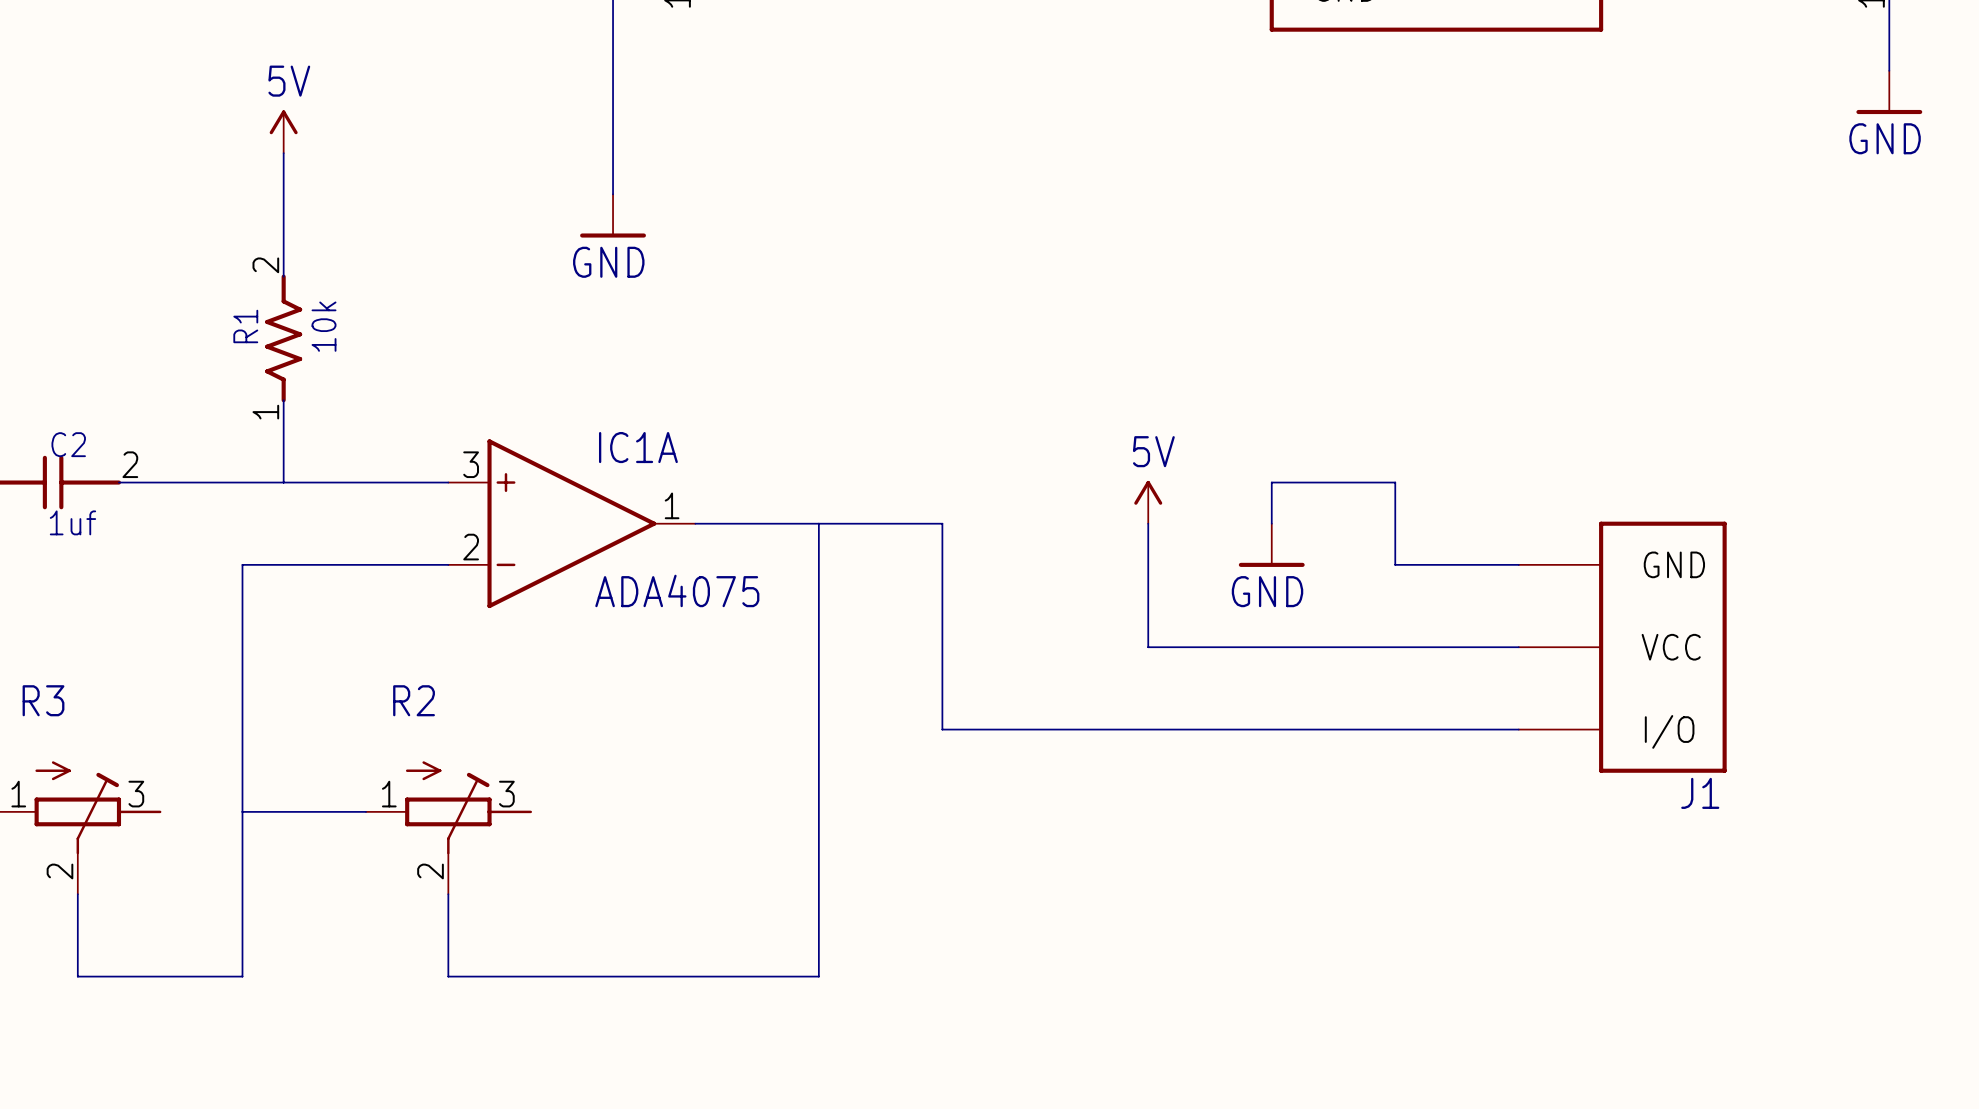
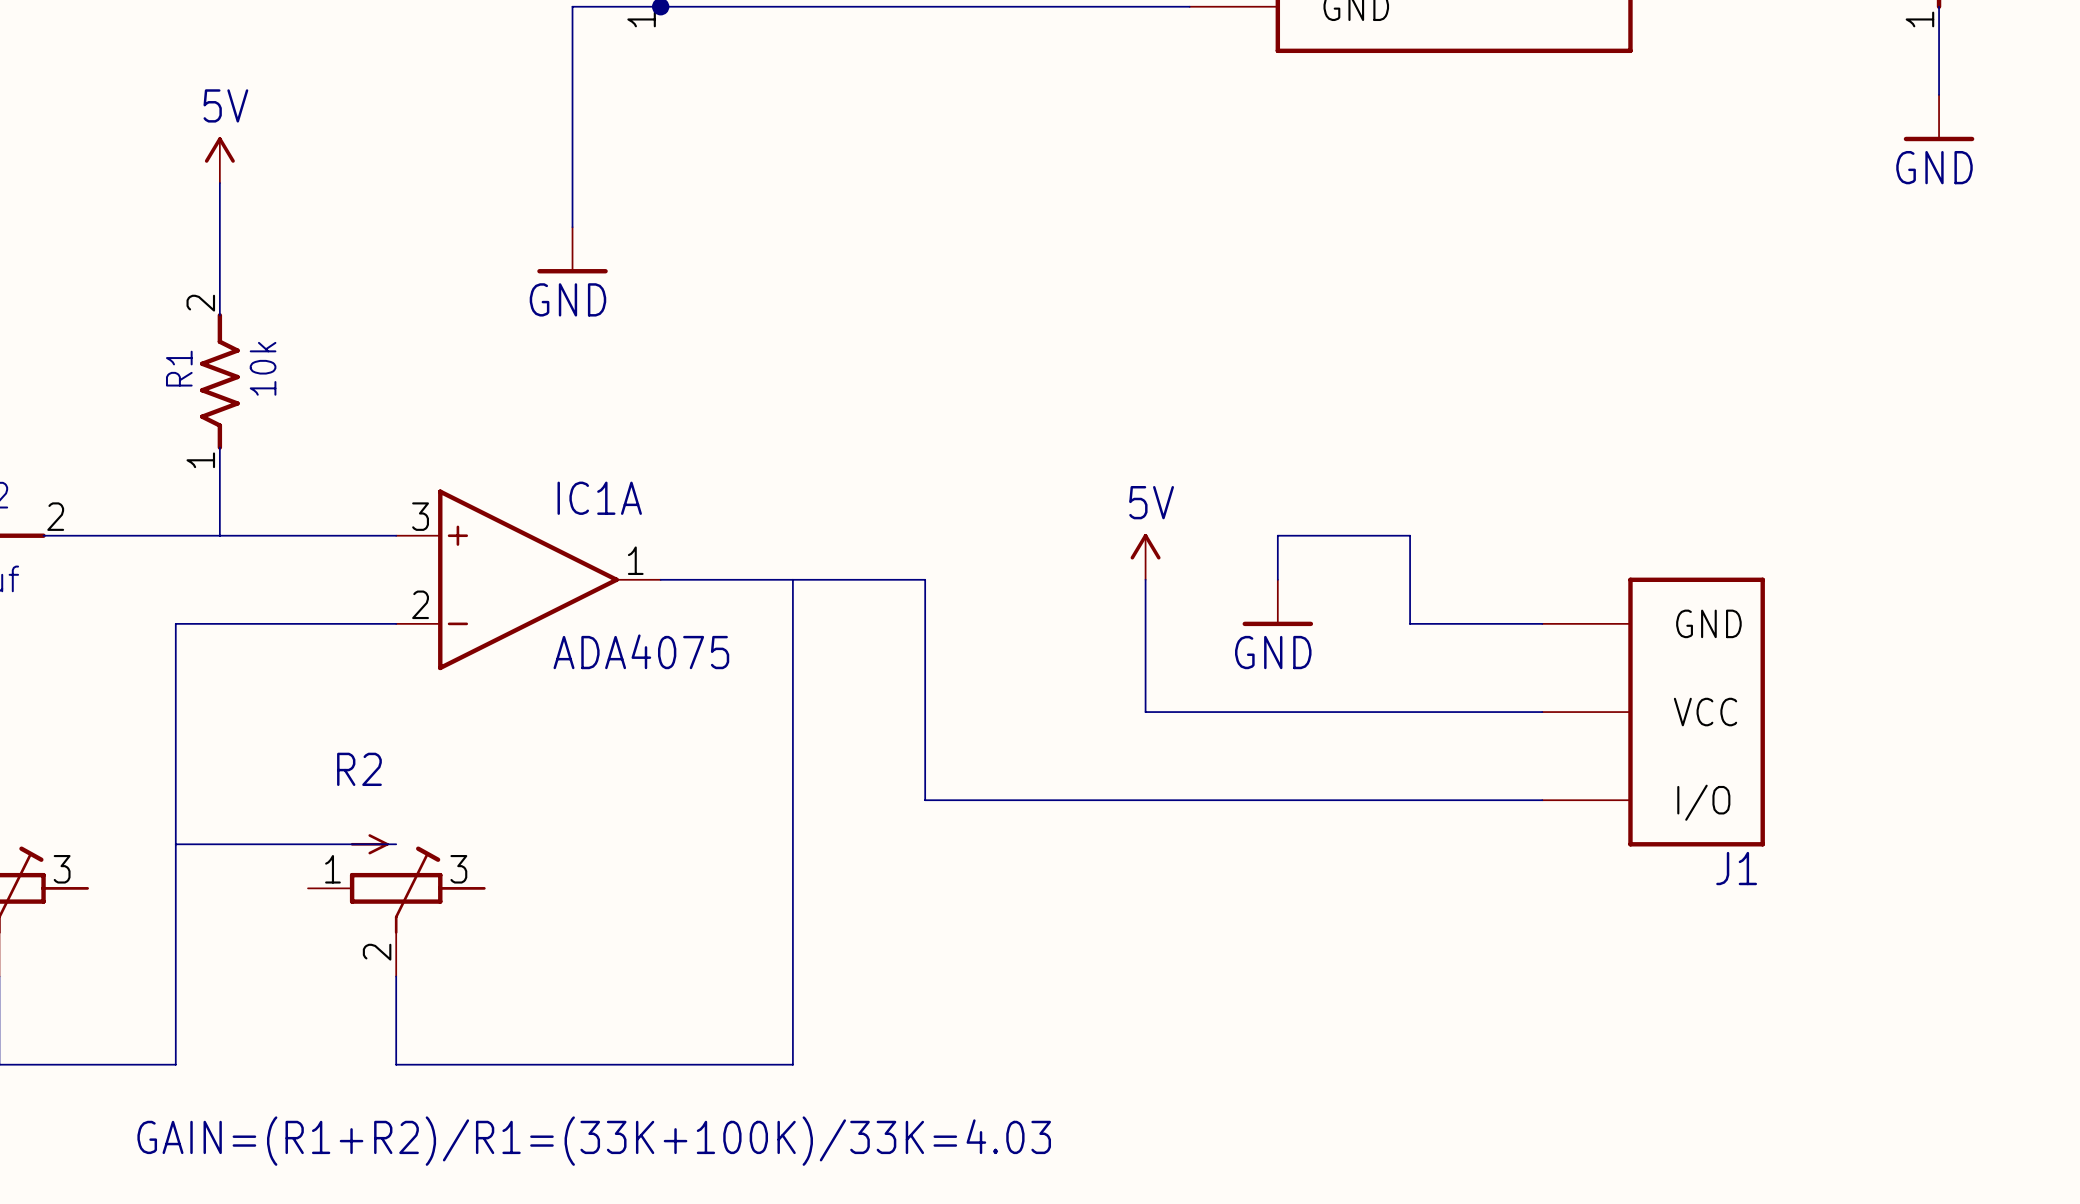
wire: none -> (175, 844) (396, 844)
wire: (242, 811) (366, 811) -> none
text: none -> GAIN=(R1+R2)/R1=(33K+100K)/33K=4.03 (594, 1141)

